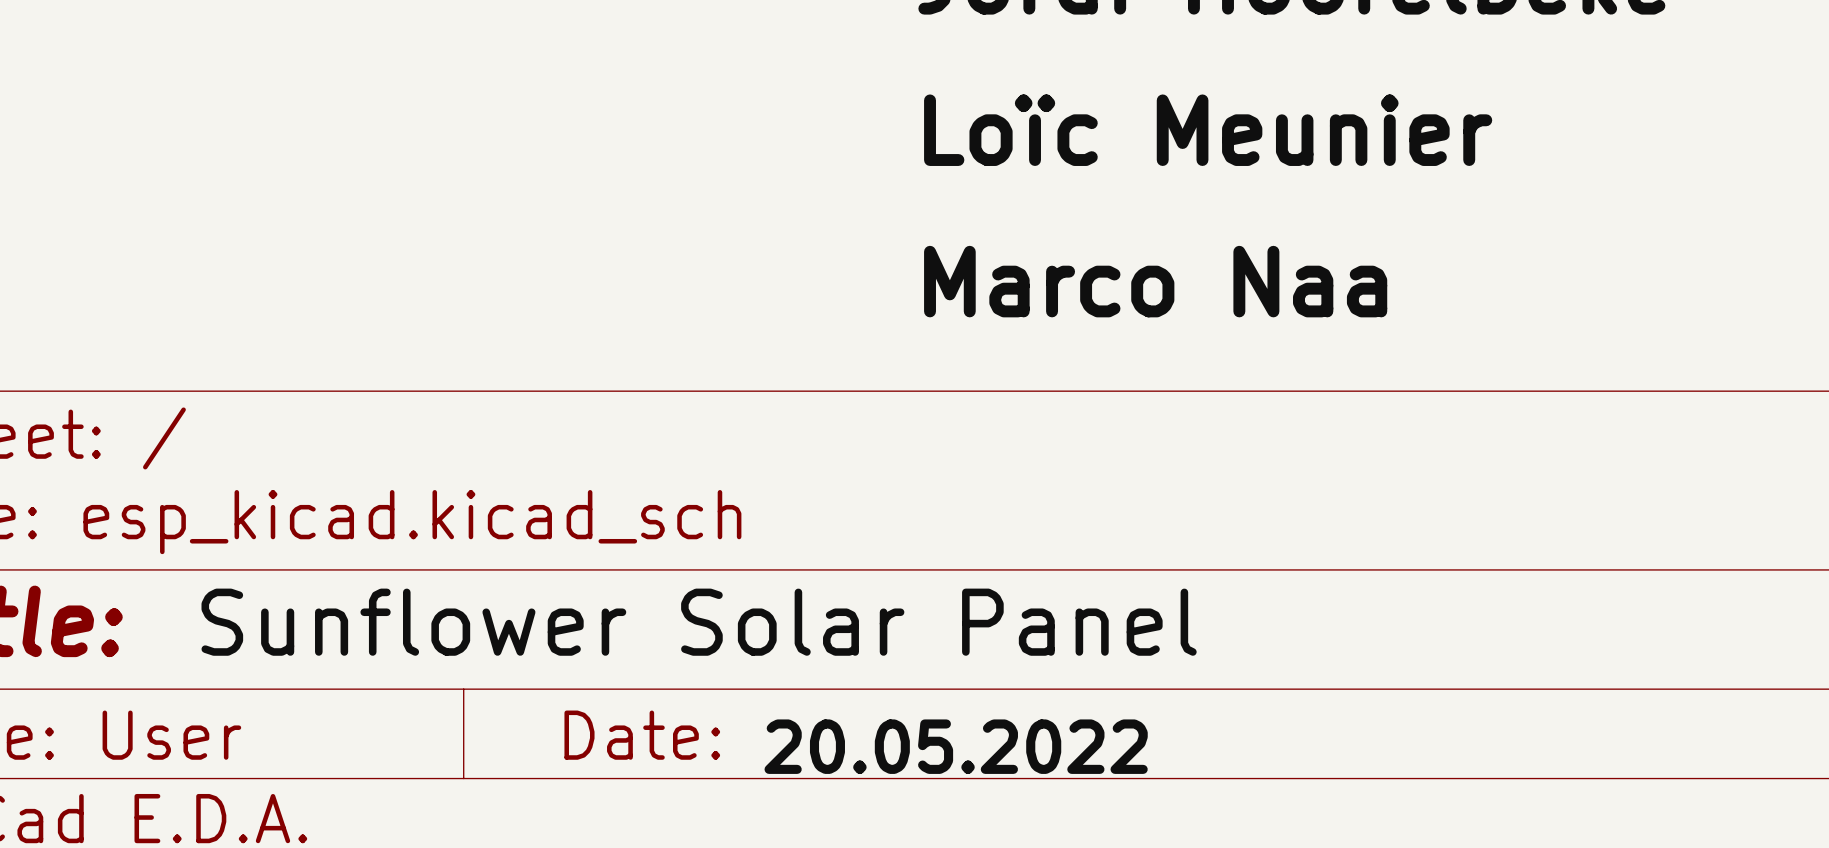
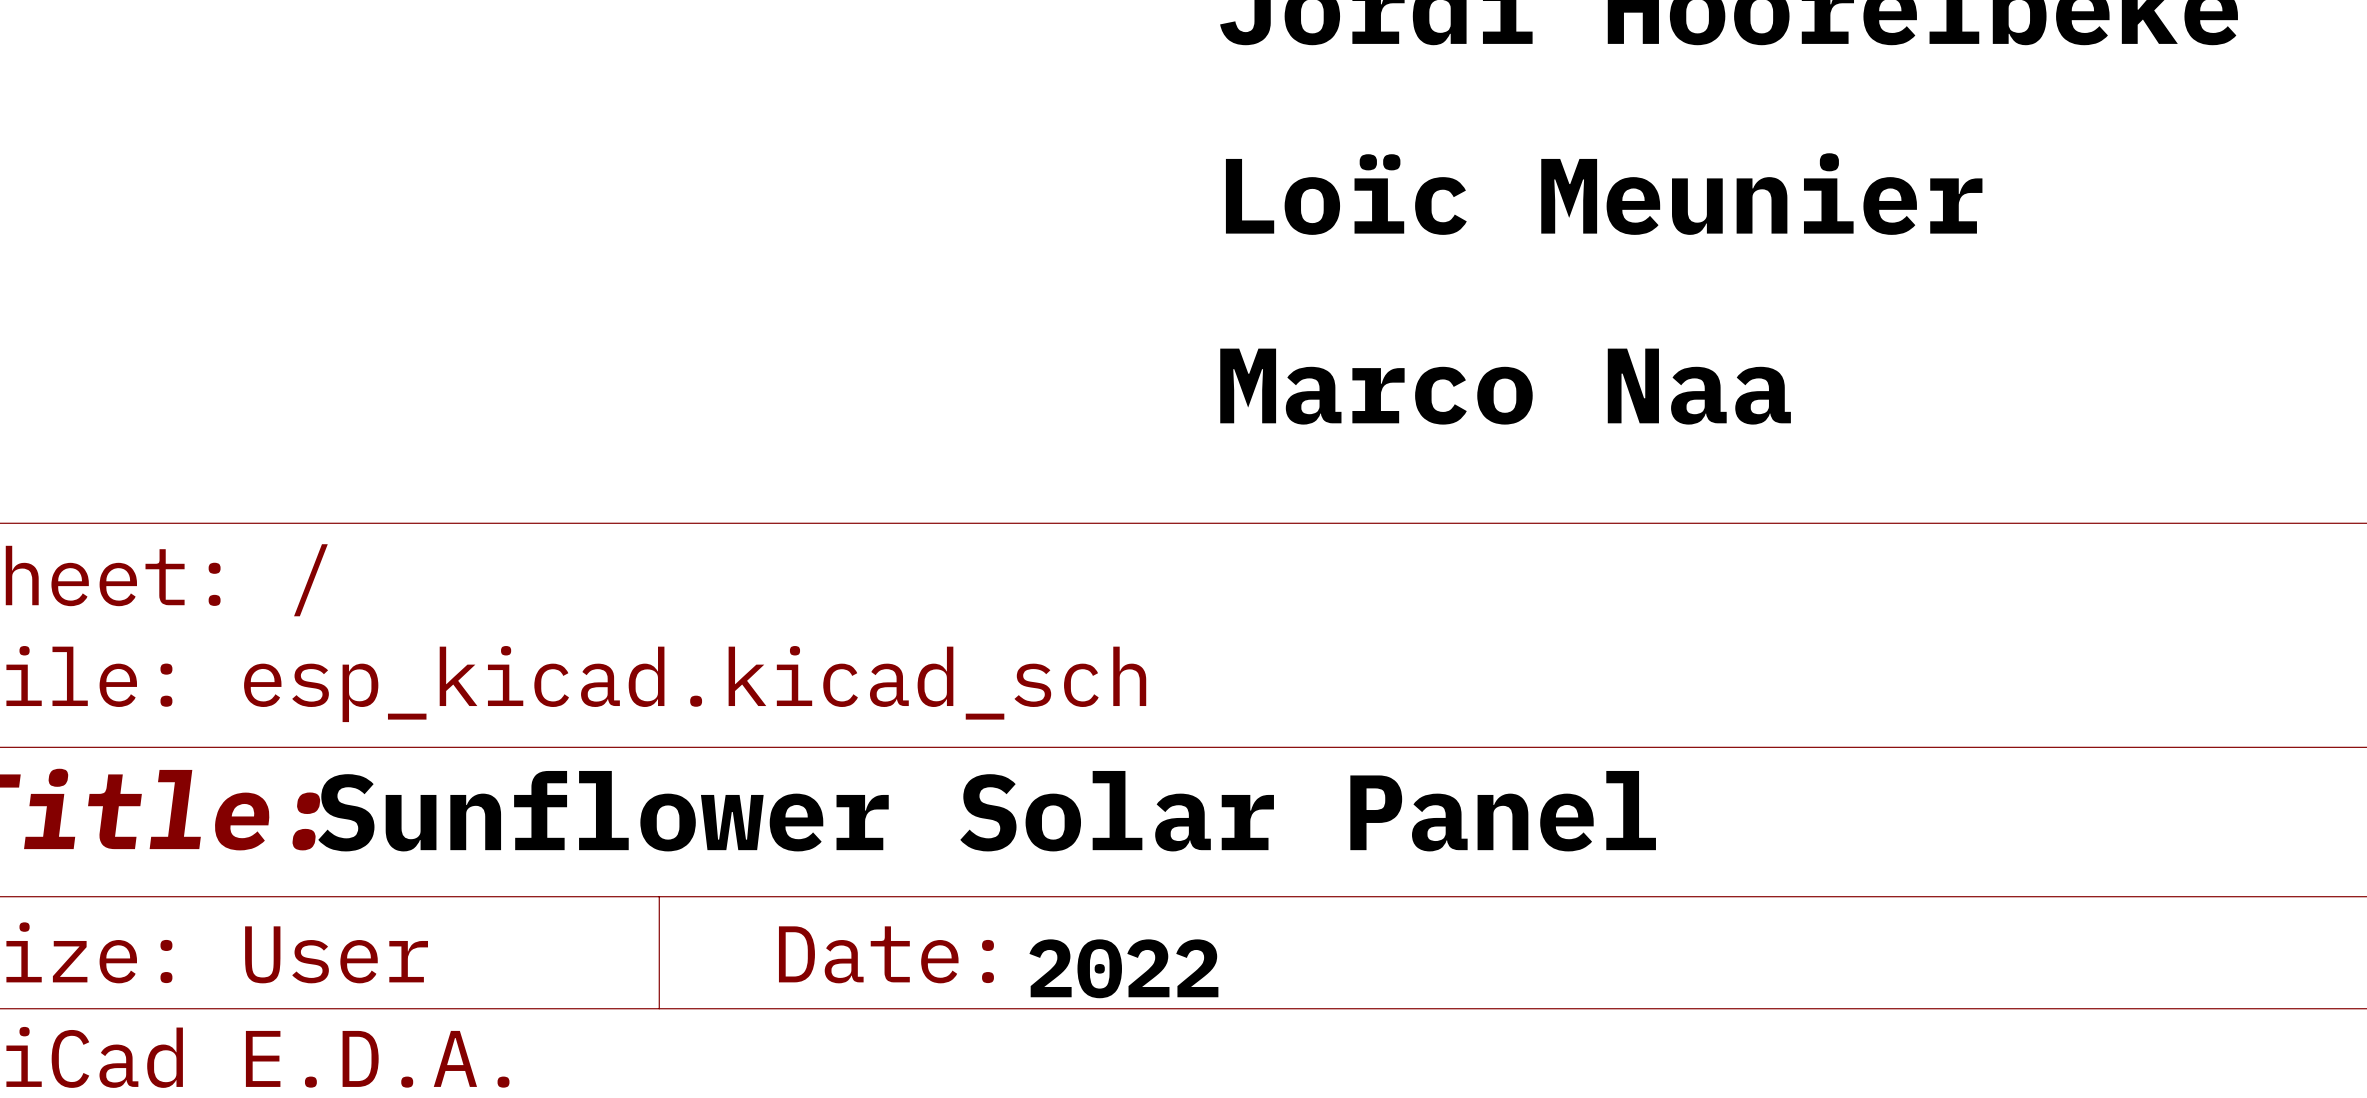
label: 20.05.2022 (956, 746) -> 2022 (1123, 968)

